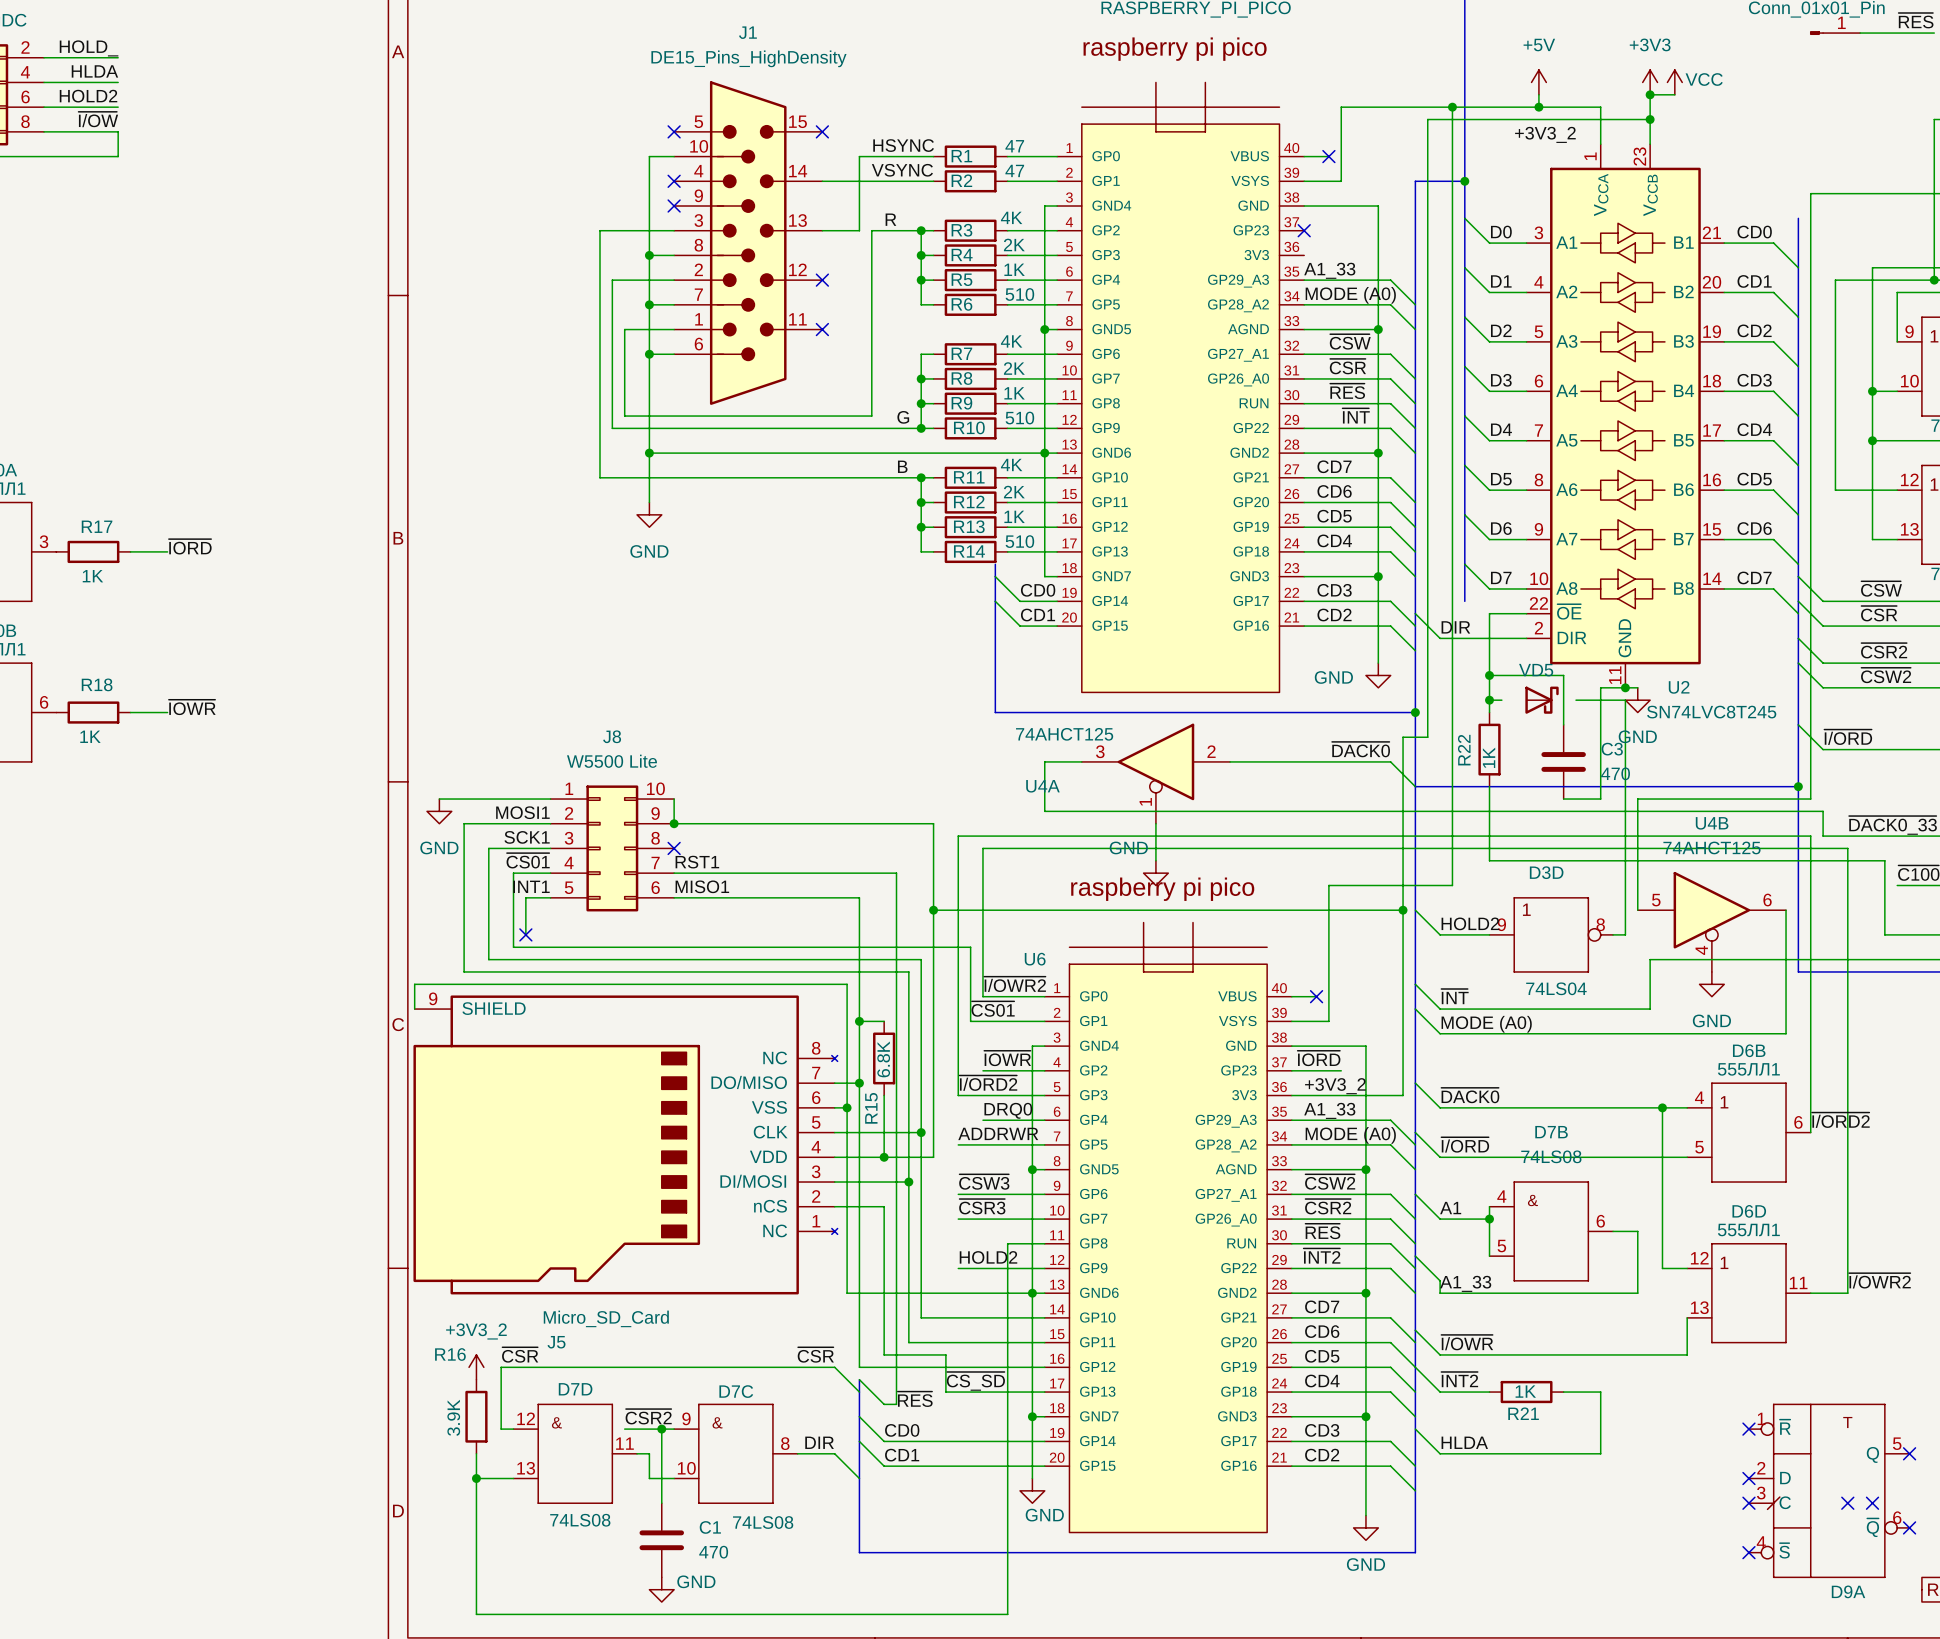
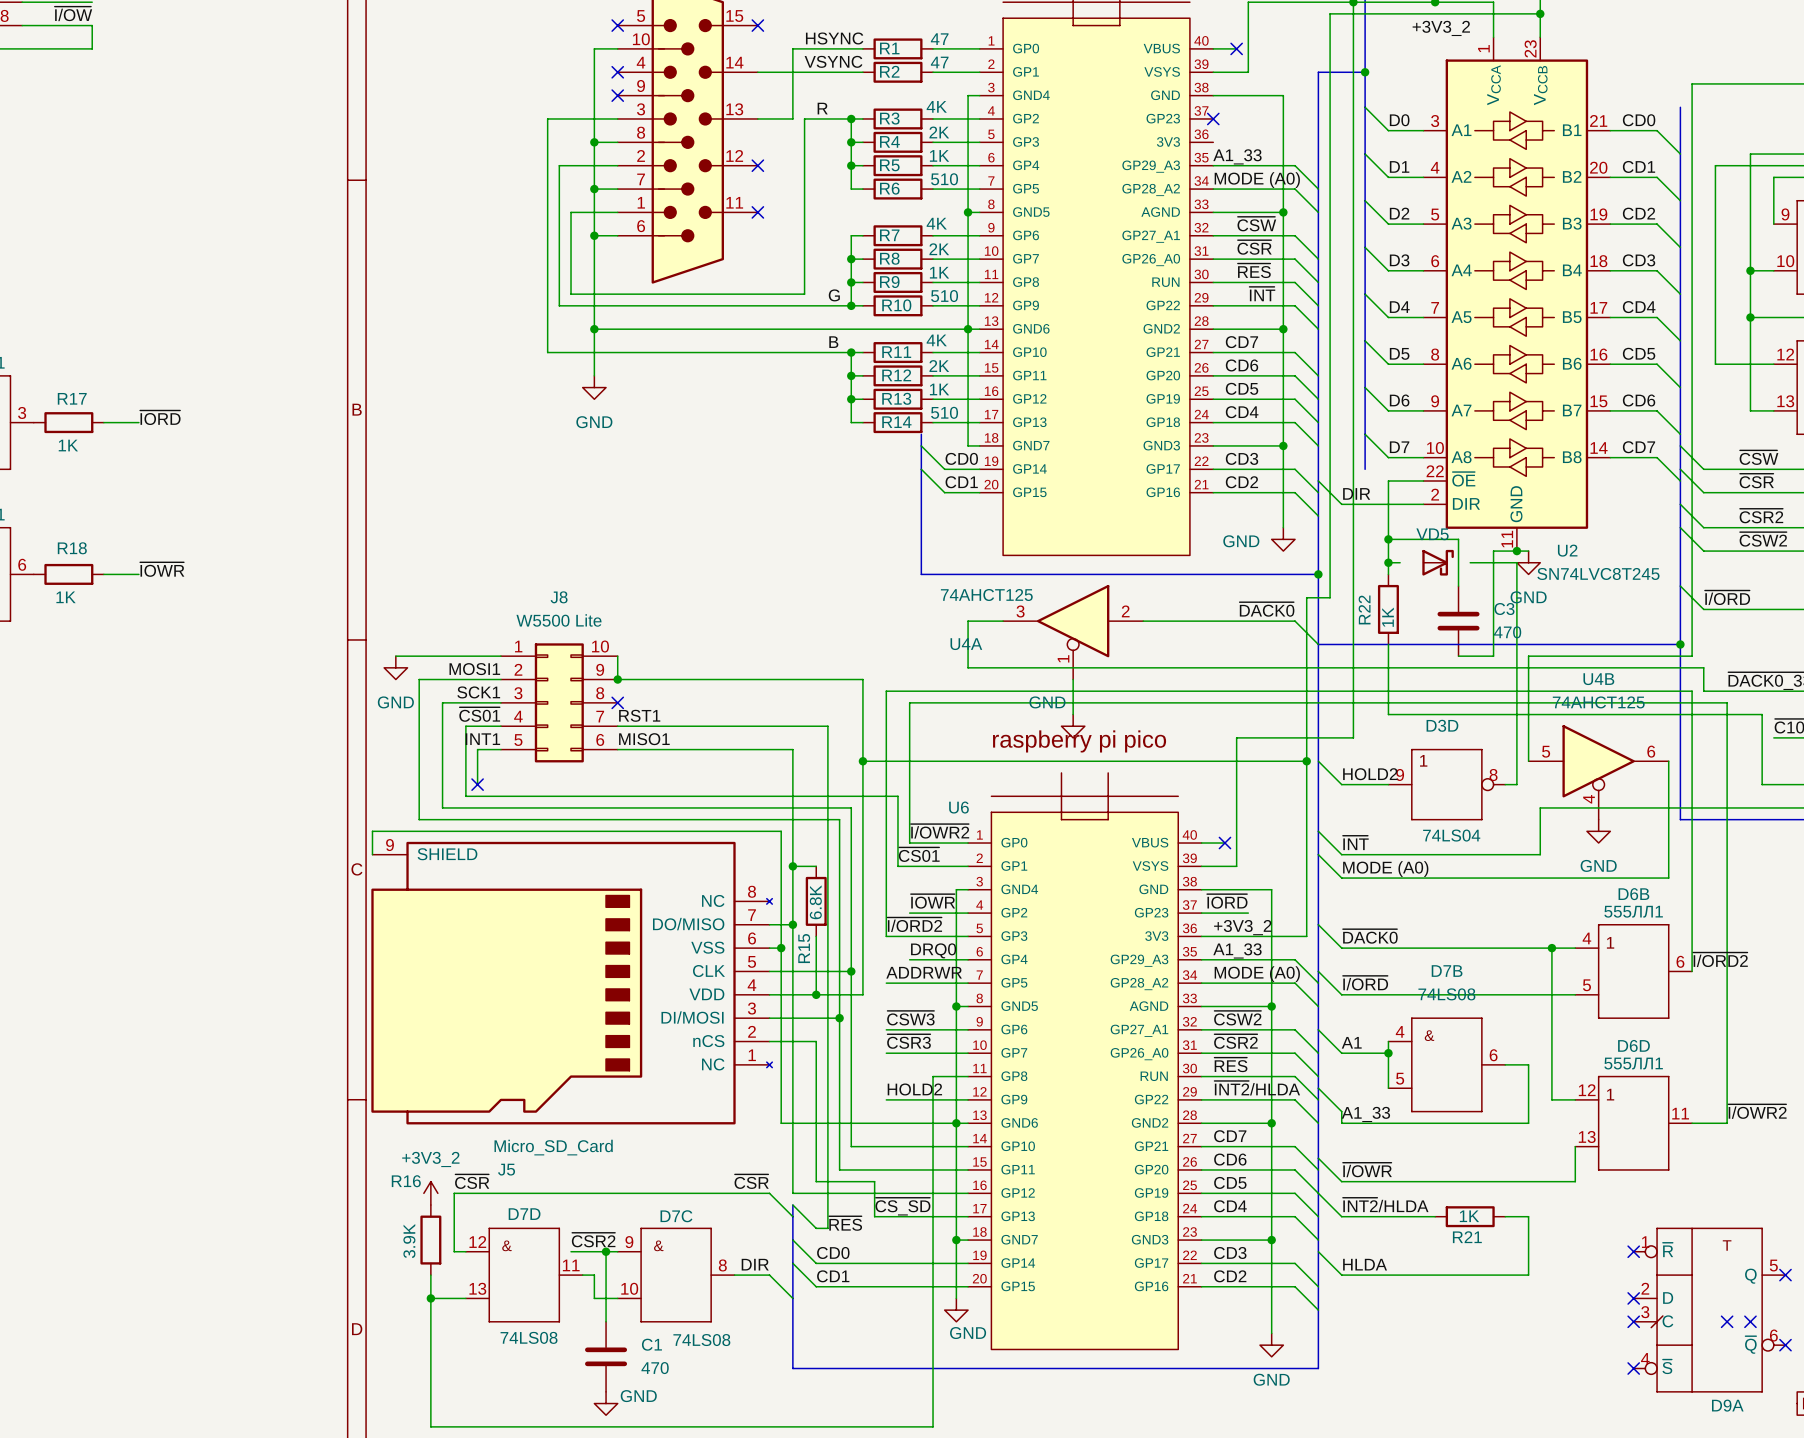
label: ~{INT2} (1321, 1256) -> ~{INT2}/HLDA (1257, 1088)
label: ~{INT2} (1459, 1379) -> ~{INT2}/HLDA (1385, 1205)
wire: none -> (1388, 1216) (1435, 1216)
R21 position: (1526, 1392) -> (1470, 1216)
wire: (1563, 1392) (1600, 1392) (1600, 1453) -> (1505, 1216) (1528, 1216) (1528, 1275) (1493, 1275)

